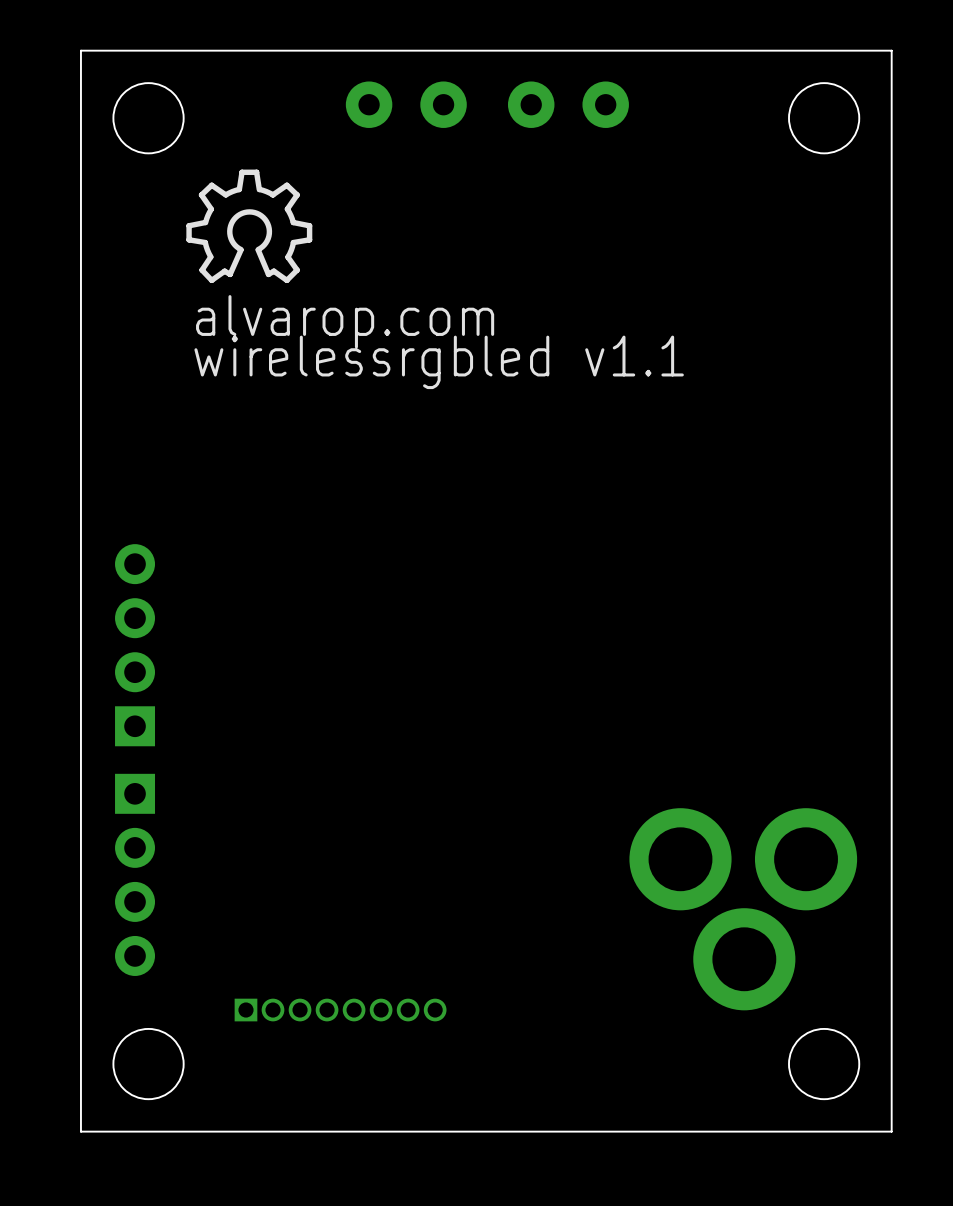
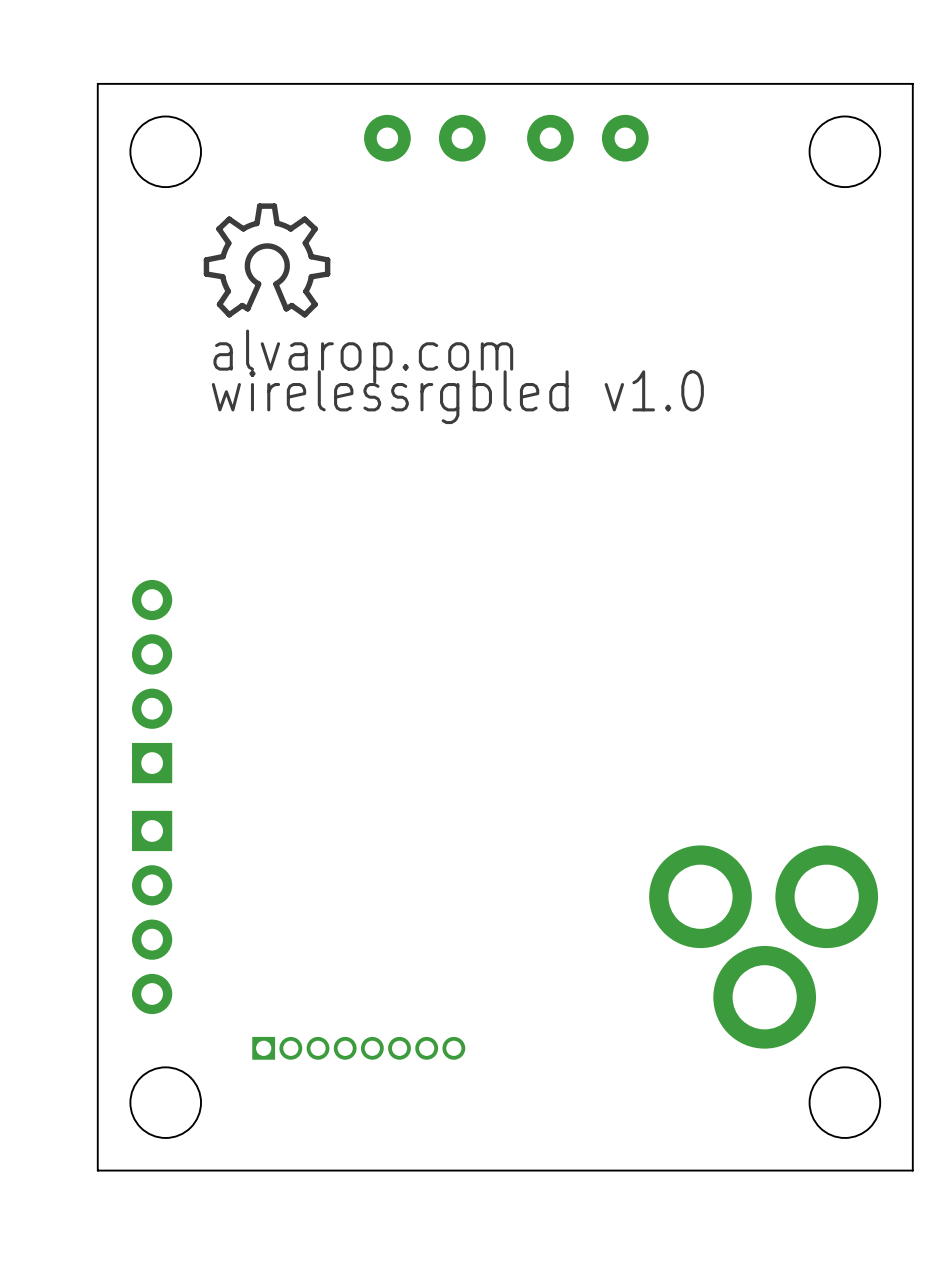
text: wirelessrgbled v1.1 (439, 362) -> wirelessrgbled v1.0 (457, 397)

